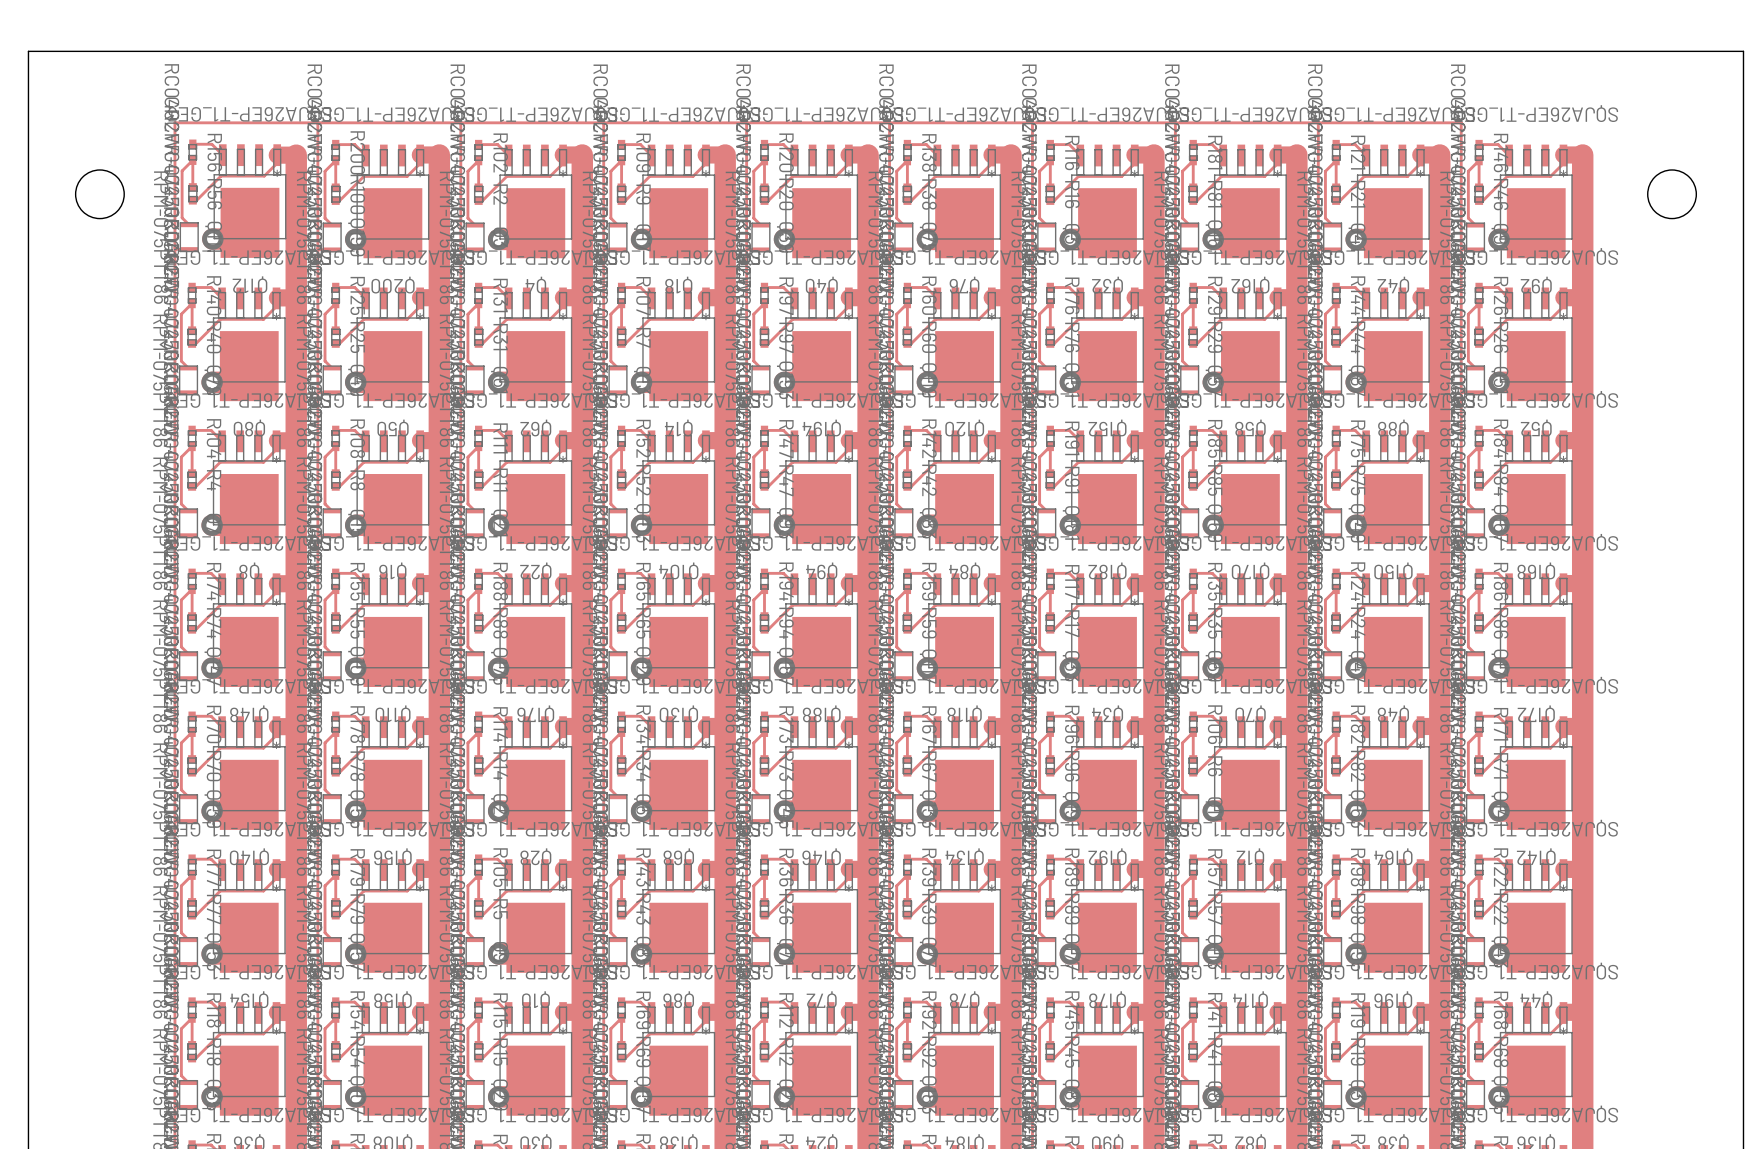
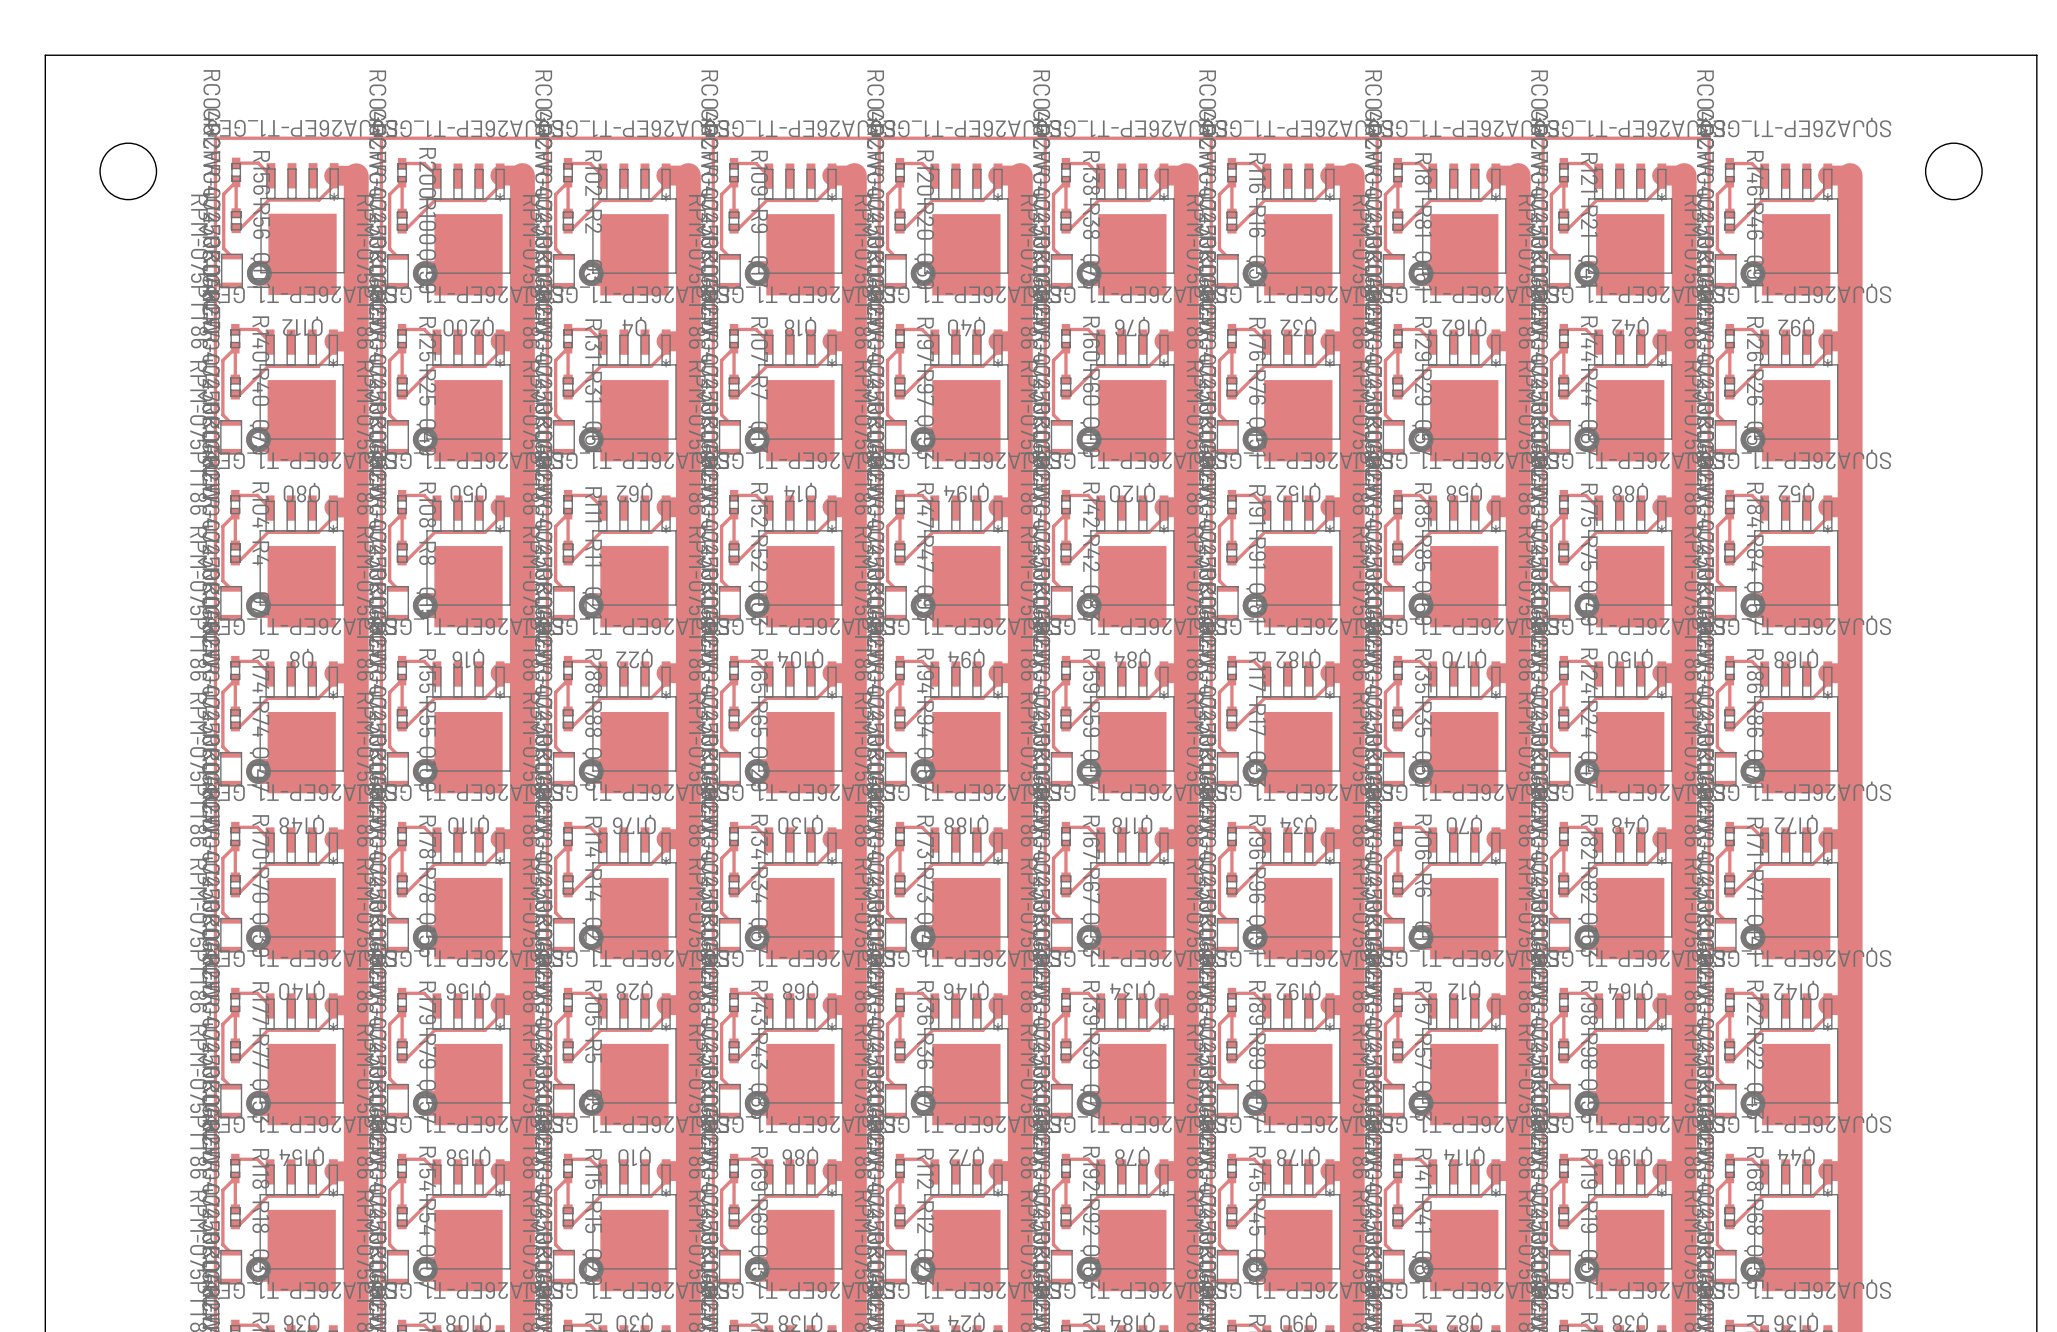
round board edge position: (99, 194) -> (128, 171)
round board edge position: (1672, 194) -> (1953, 171)

